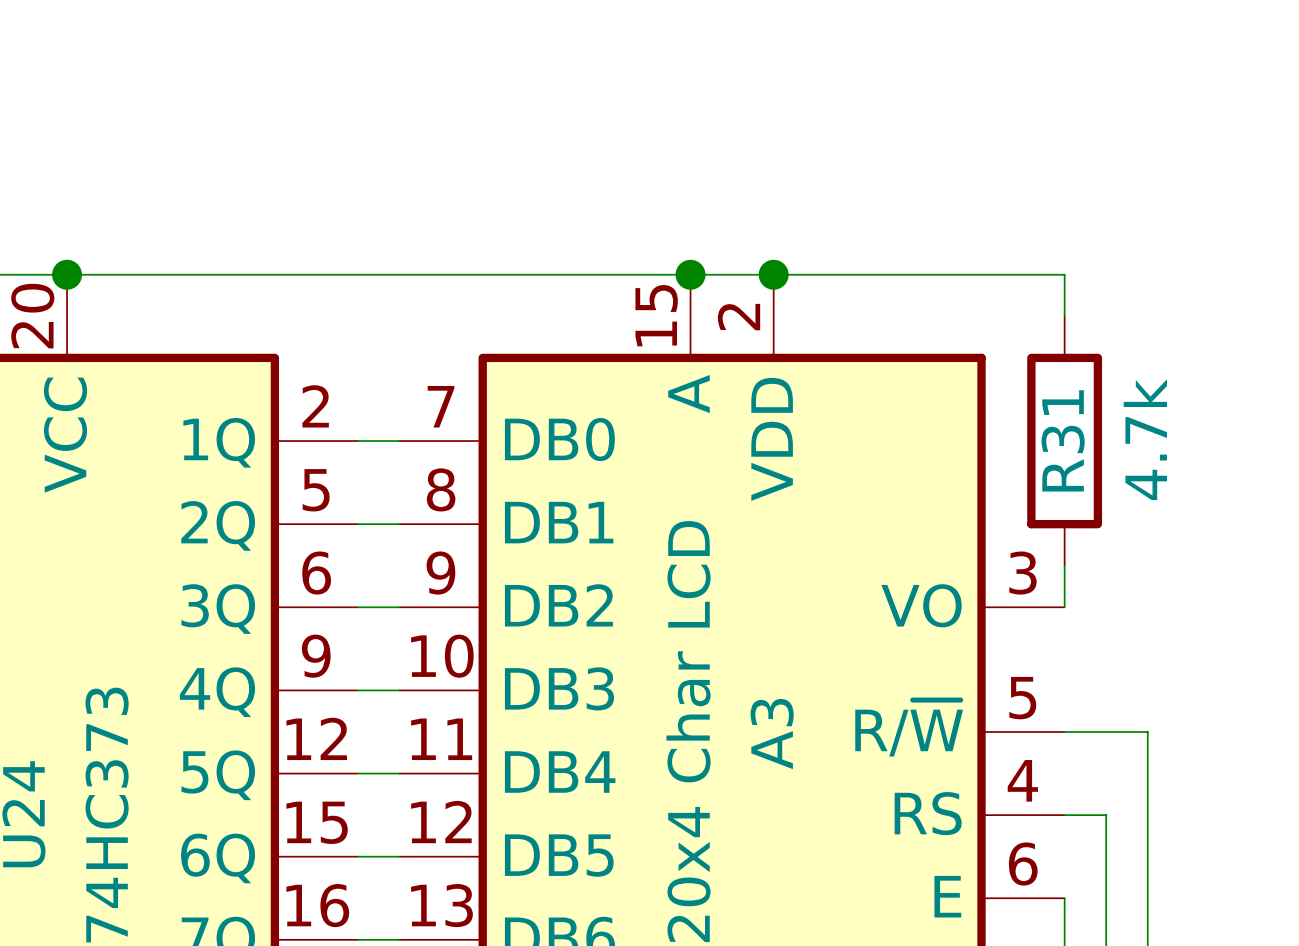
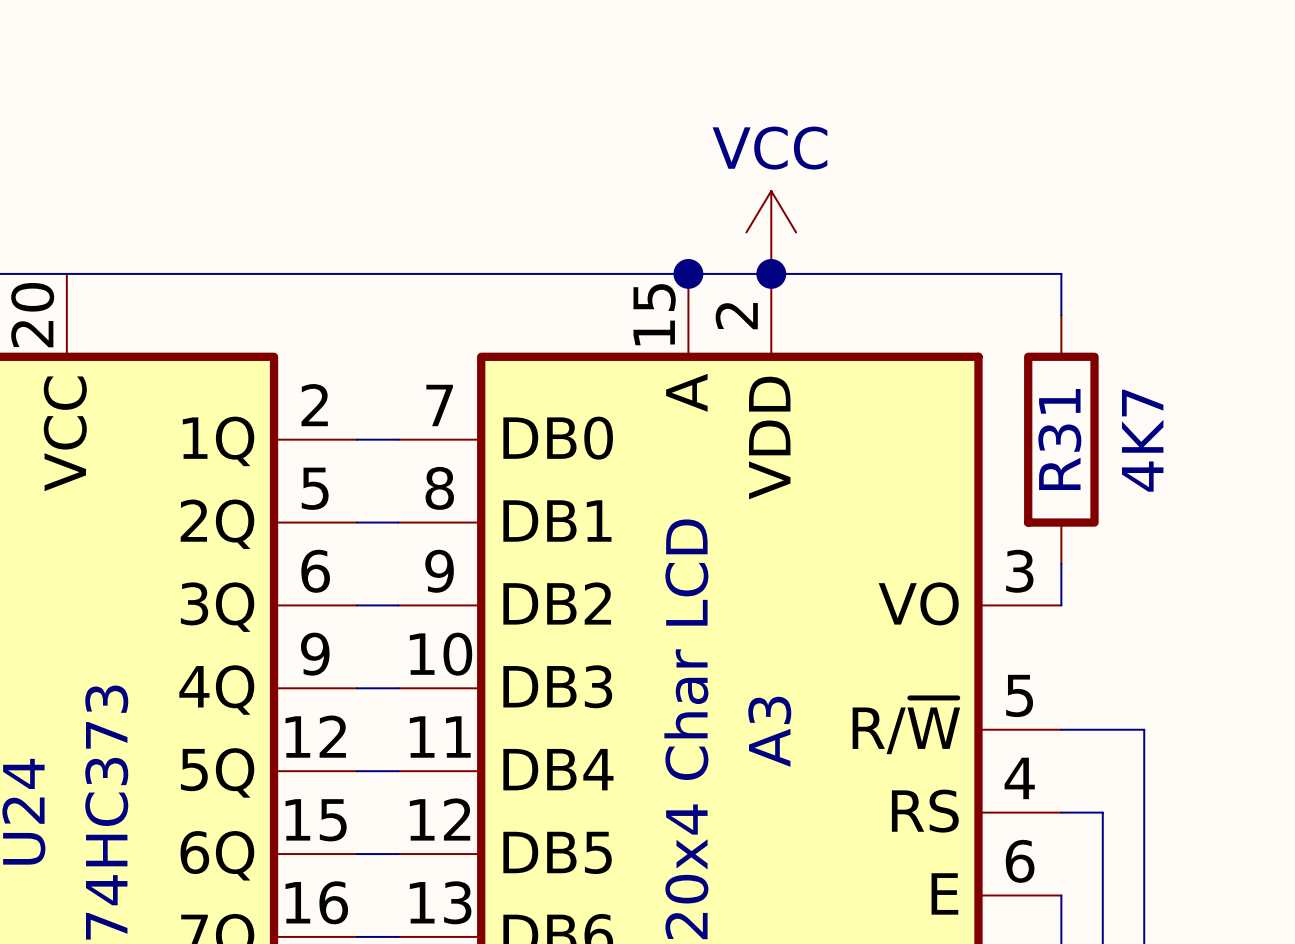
power symbol: none -> VCC (771, 232)
junction: (67, 274) -> none
R31 value: 4.7k (1145, 439) -> 4K7 (1142, 440)

